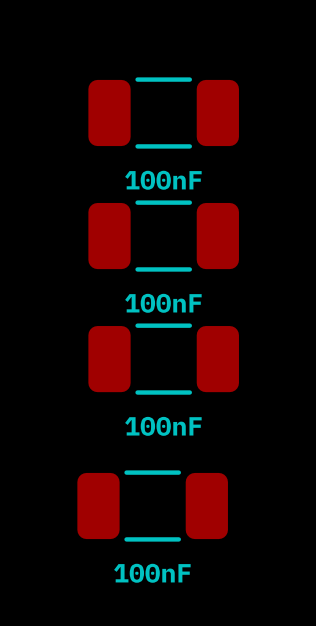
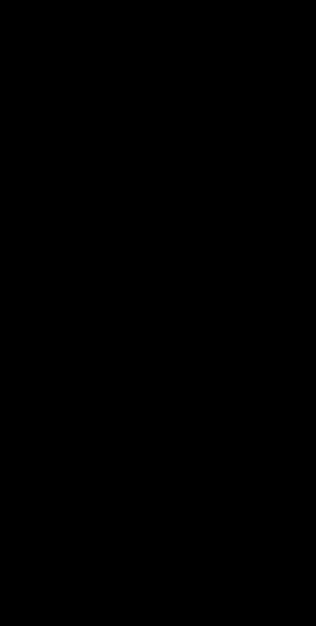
part: 100nF (163, 112) -> none
part: 100nF (163, 236) -> none
part: 100nF (163, 359) -> none
part: 100nF (152, 506) -> none

